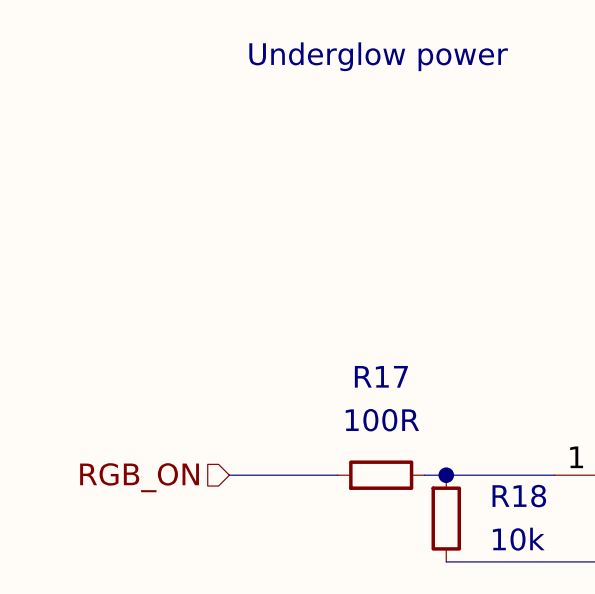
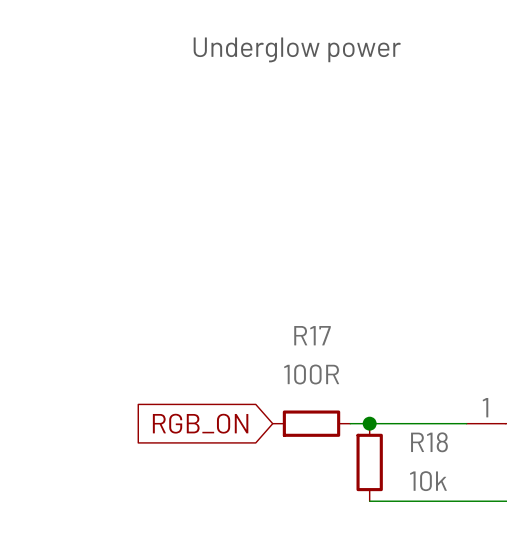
wire: (229, 475) (337, 475) -> none
hierarchical label: RGB_ON (139, 477) -> none
global label: none -> RGB_ON (200, 423)

